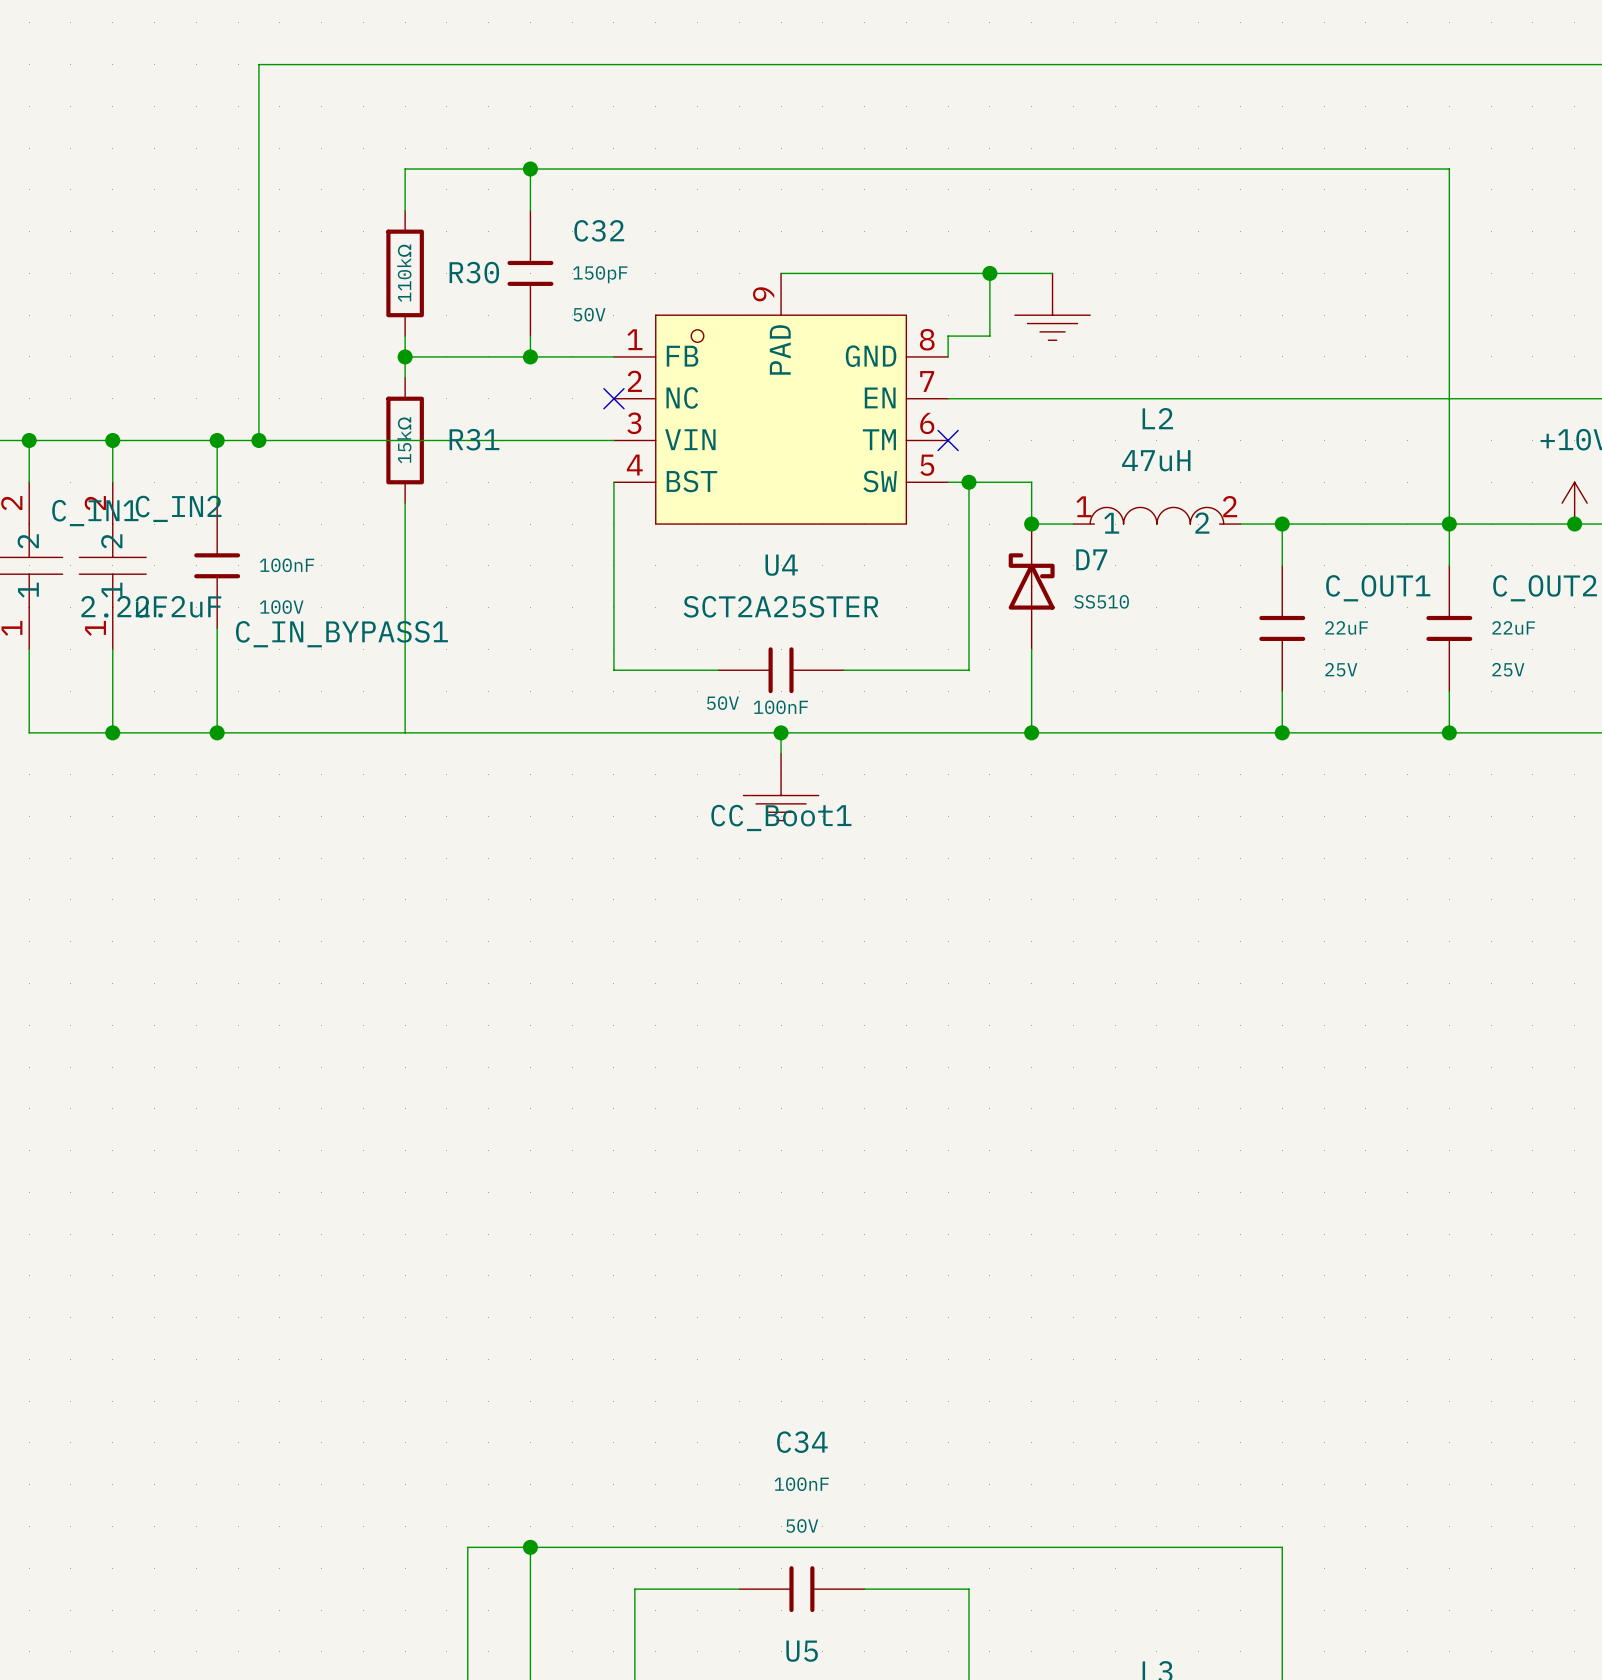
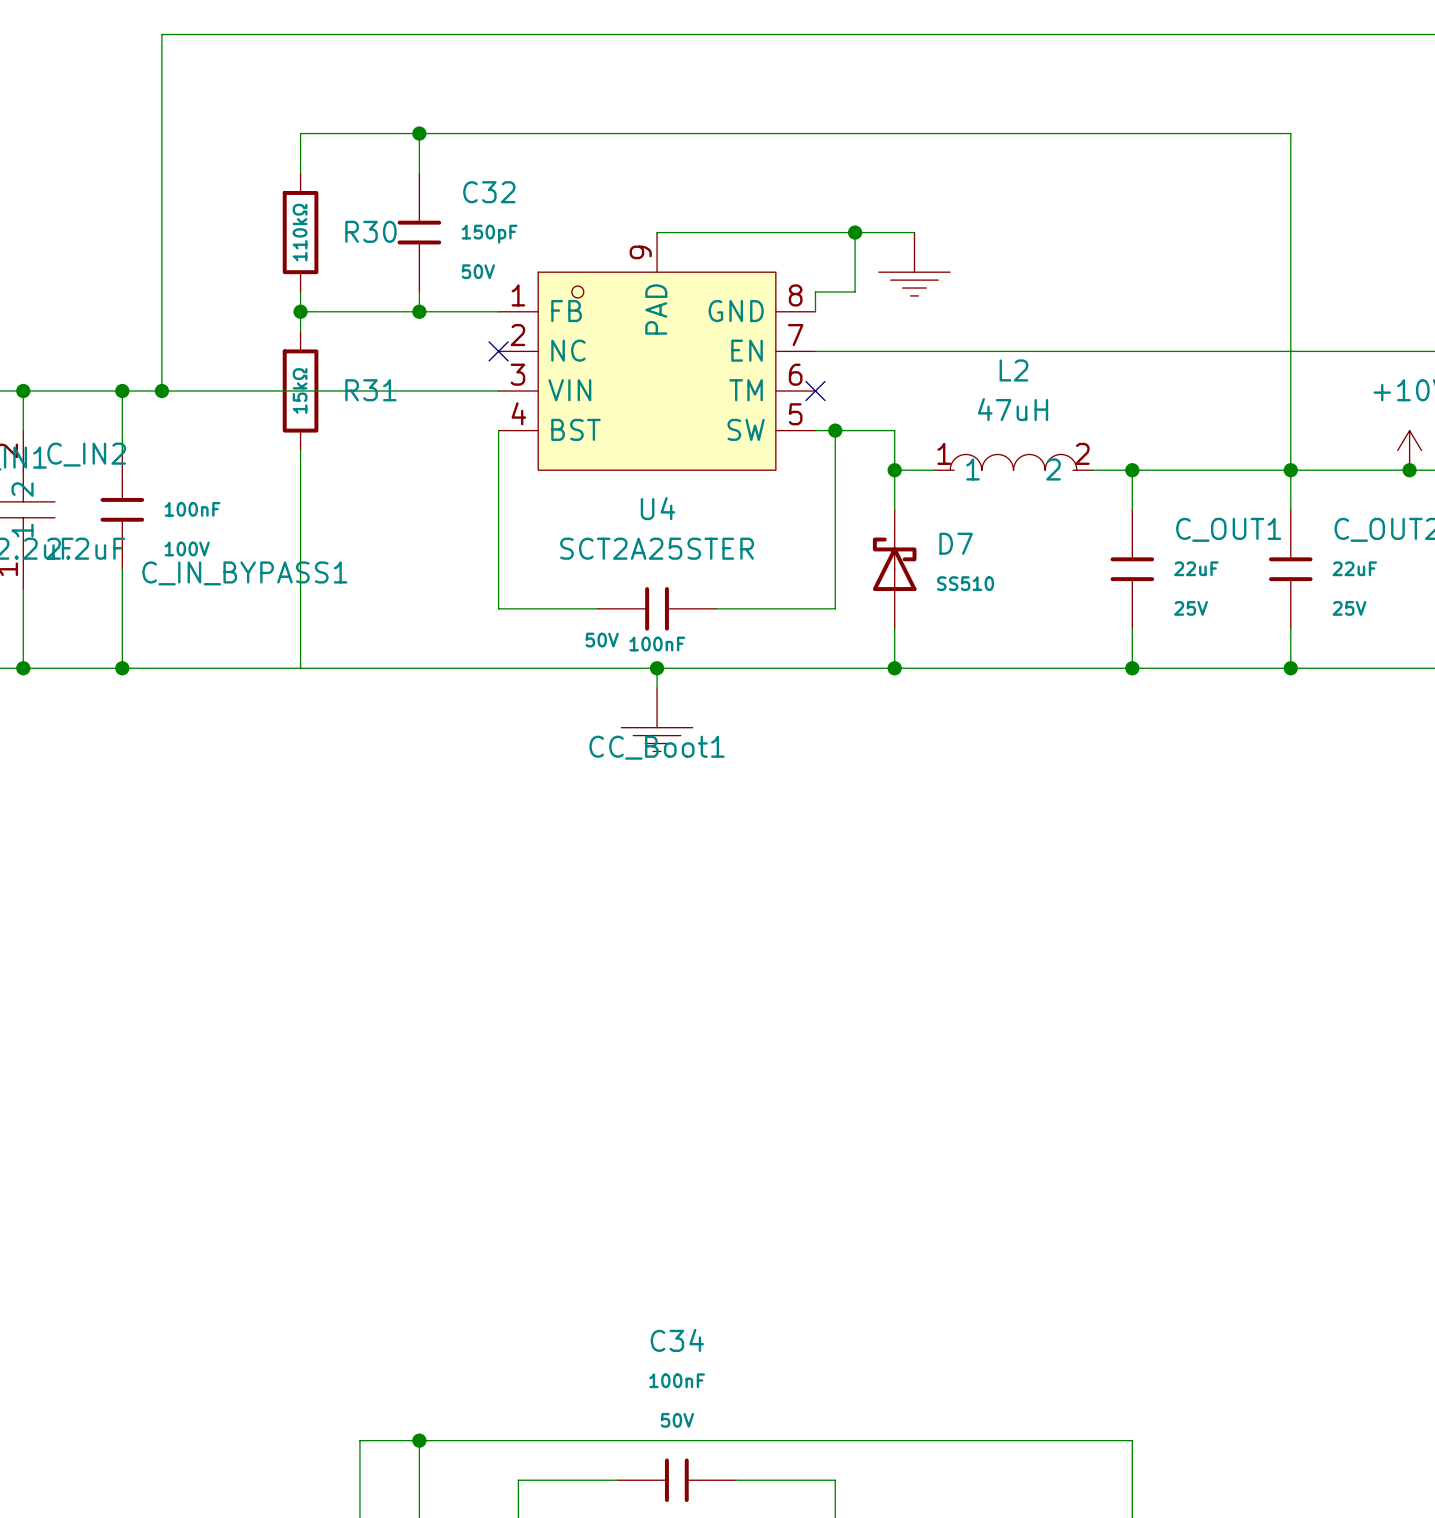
D7 position: (1031, 586) -> (894, 569)

